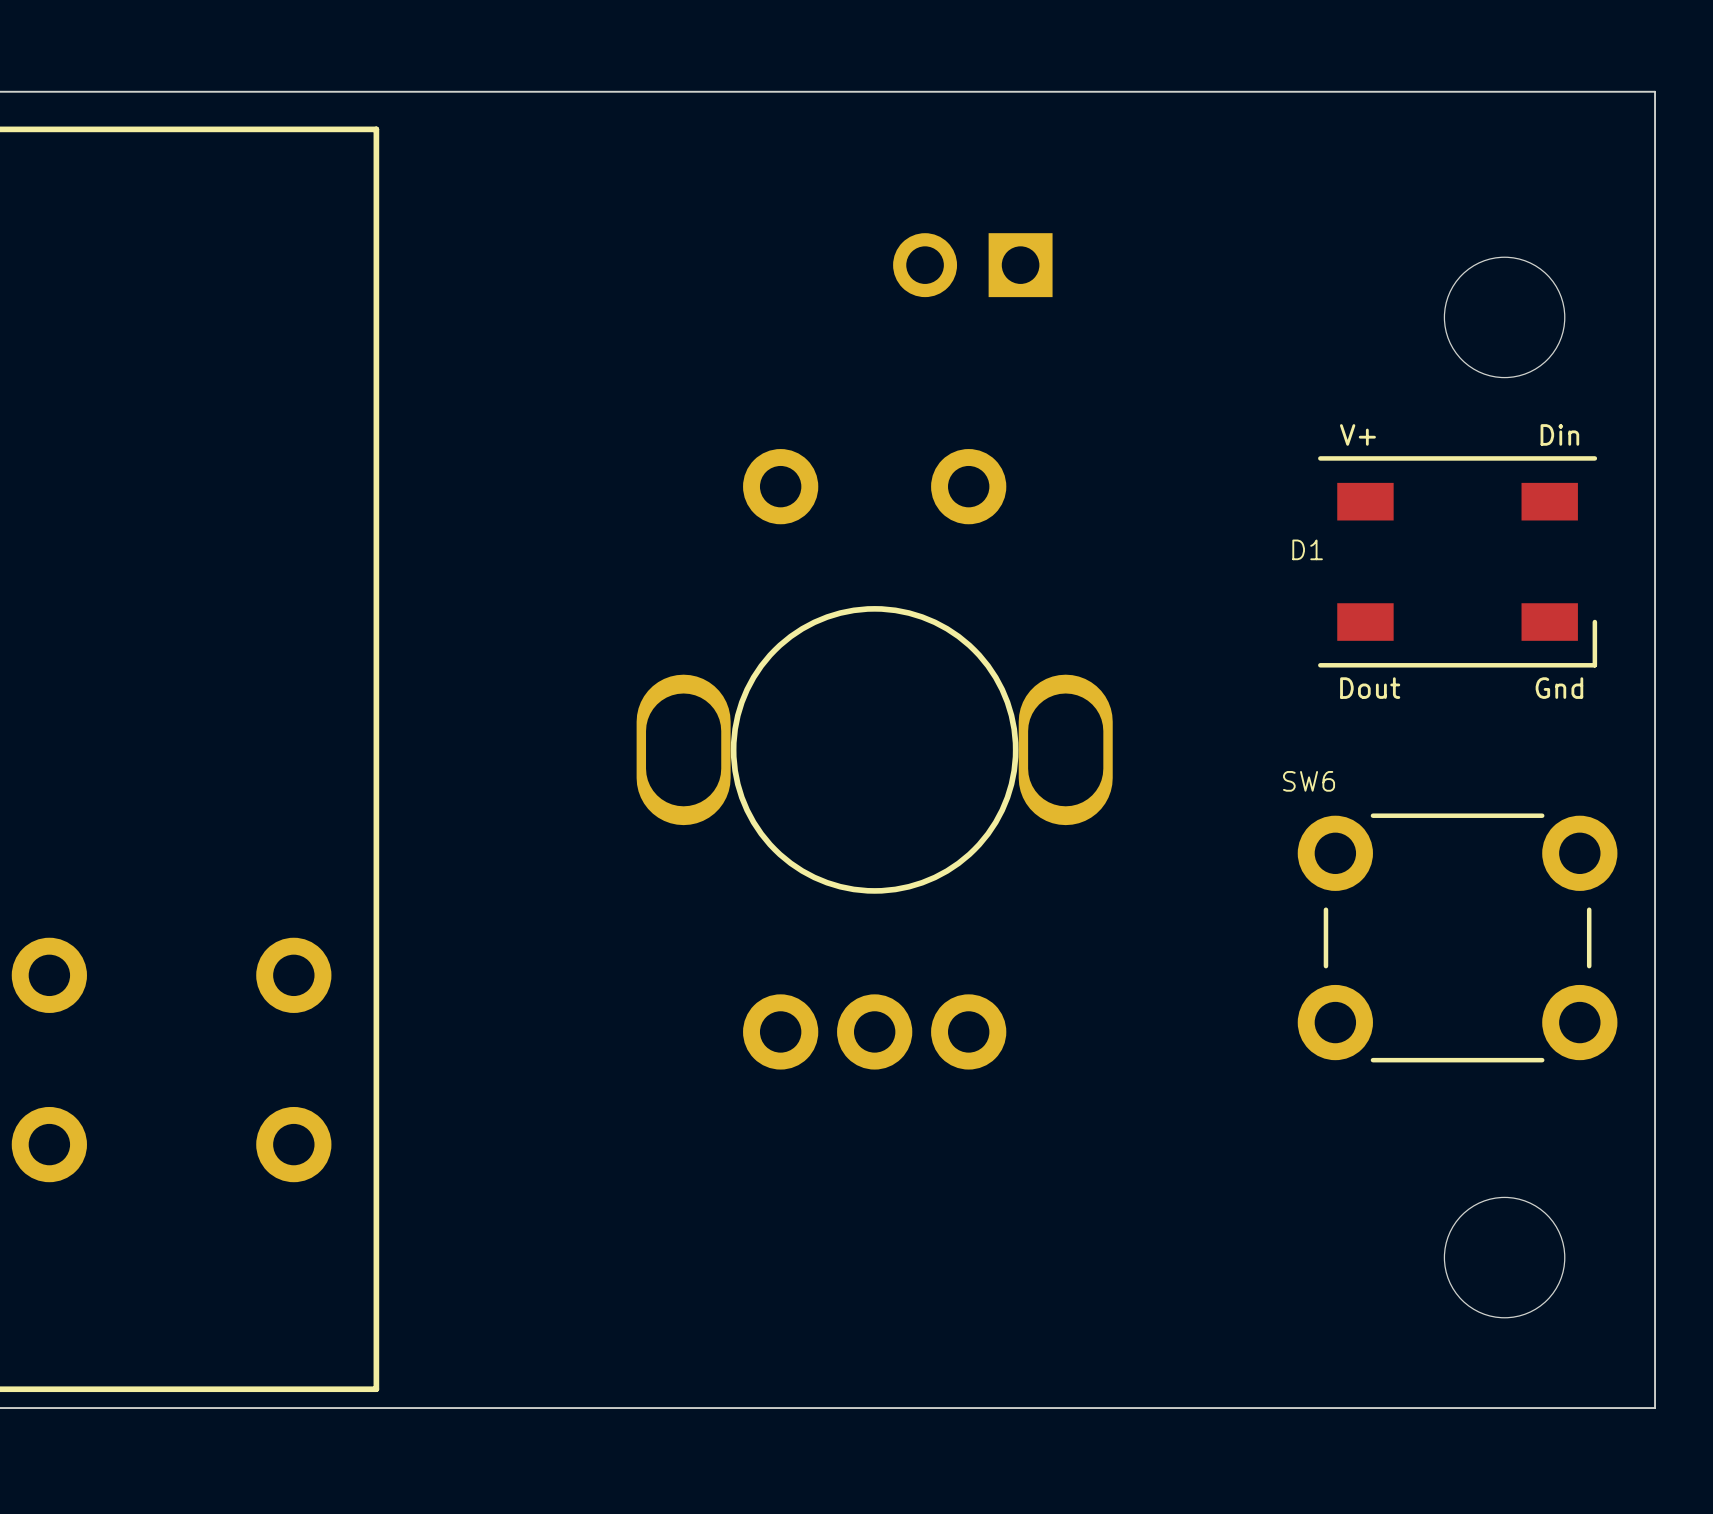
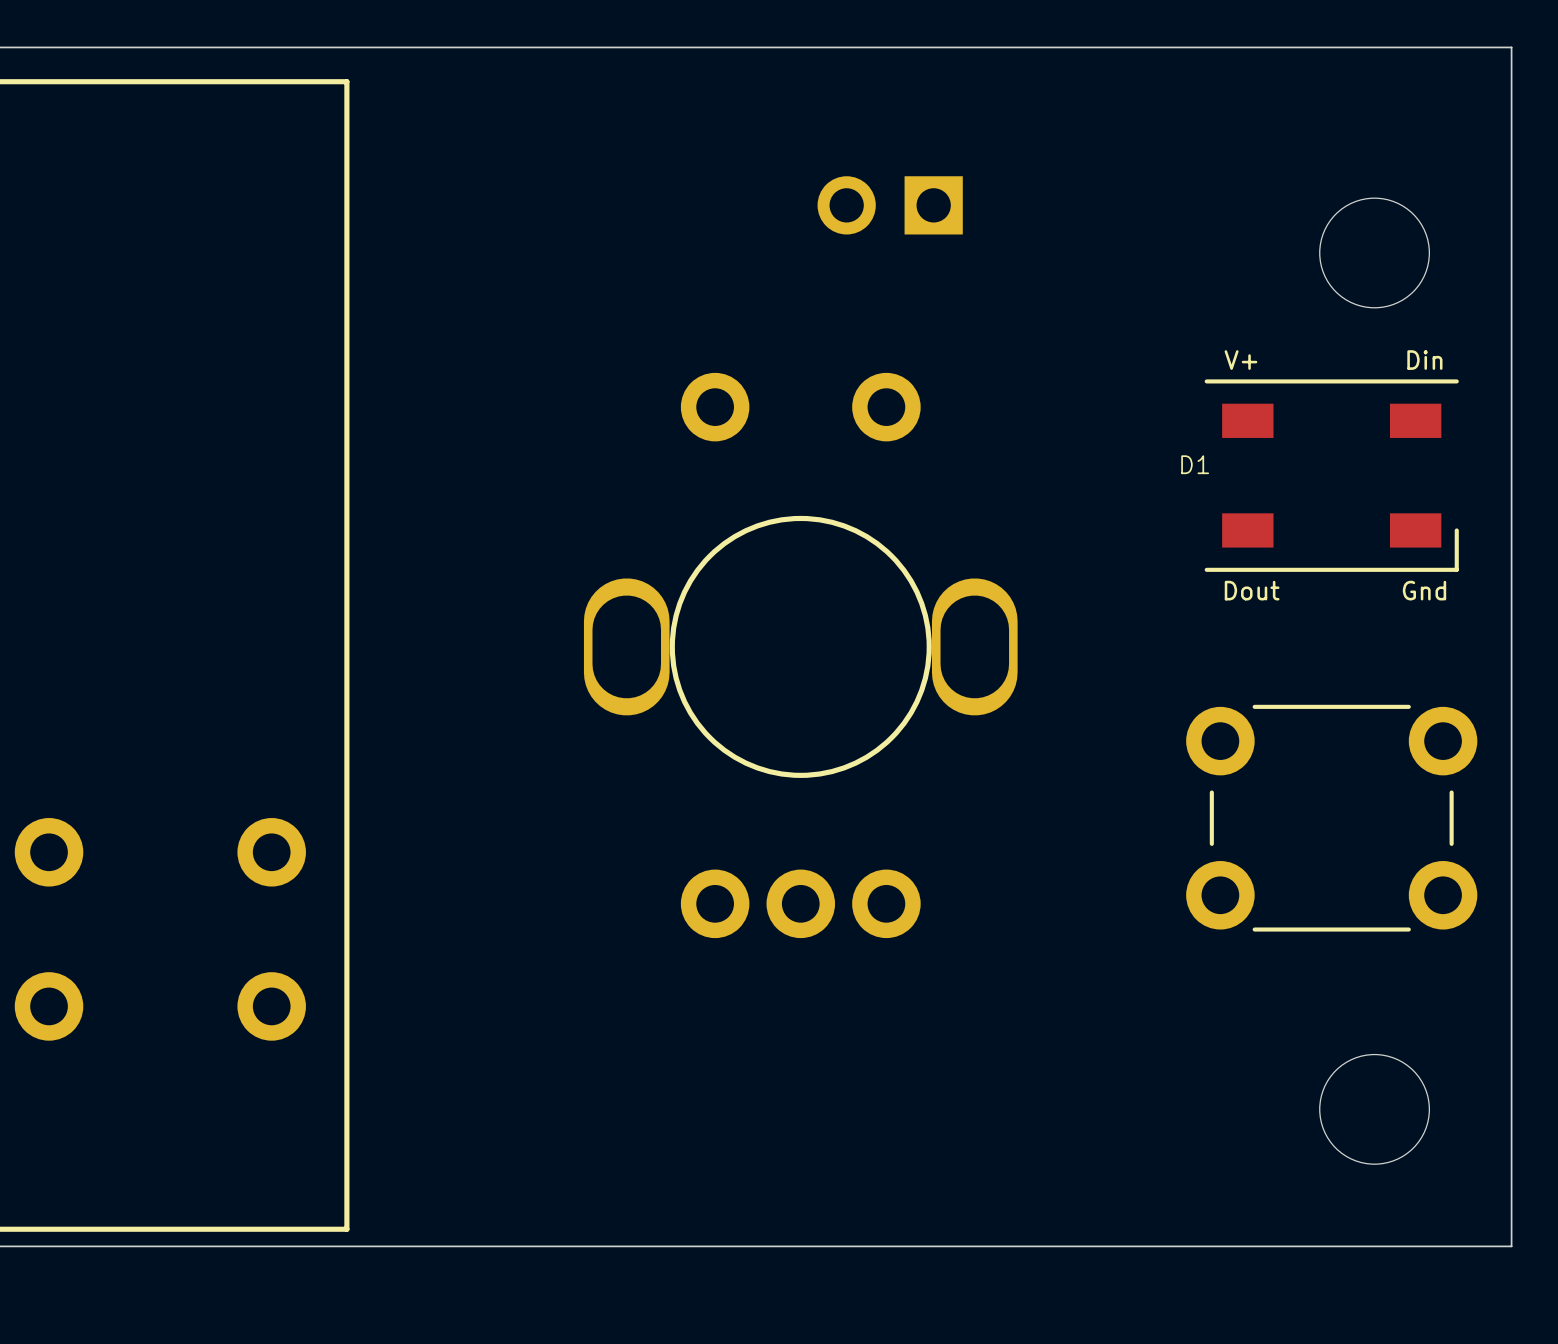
SW6 name: SW6 (1309, 781) -> none

